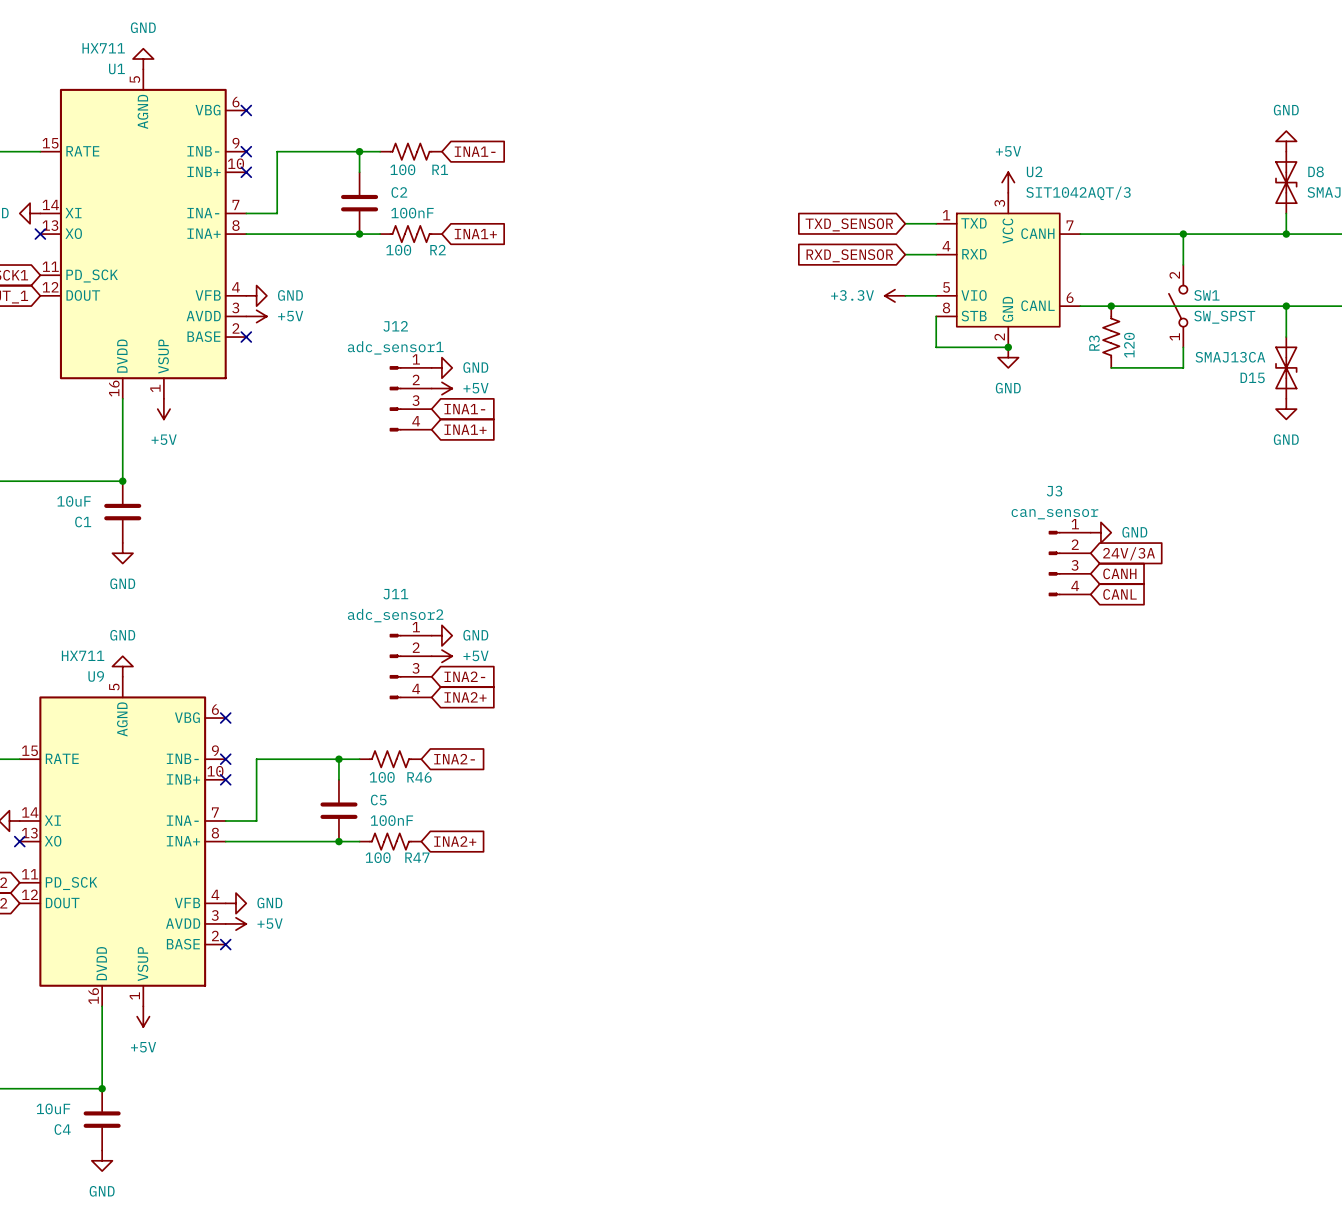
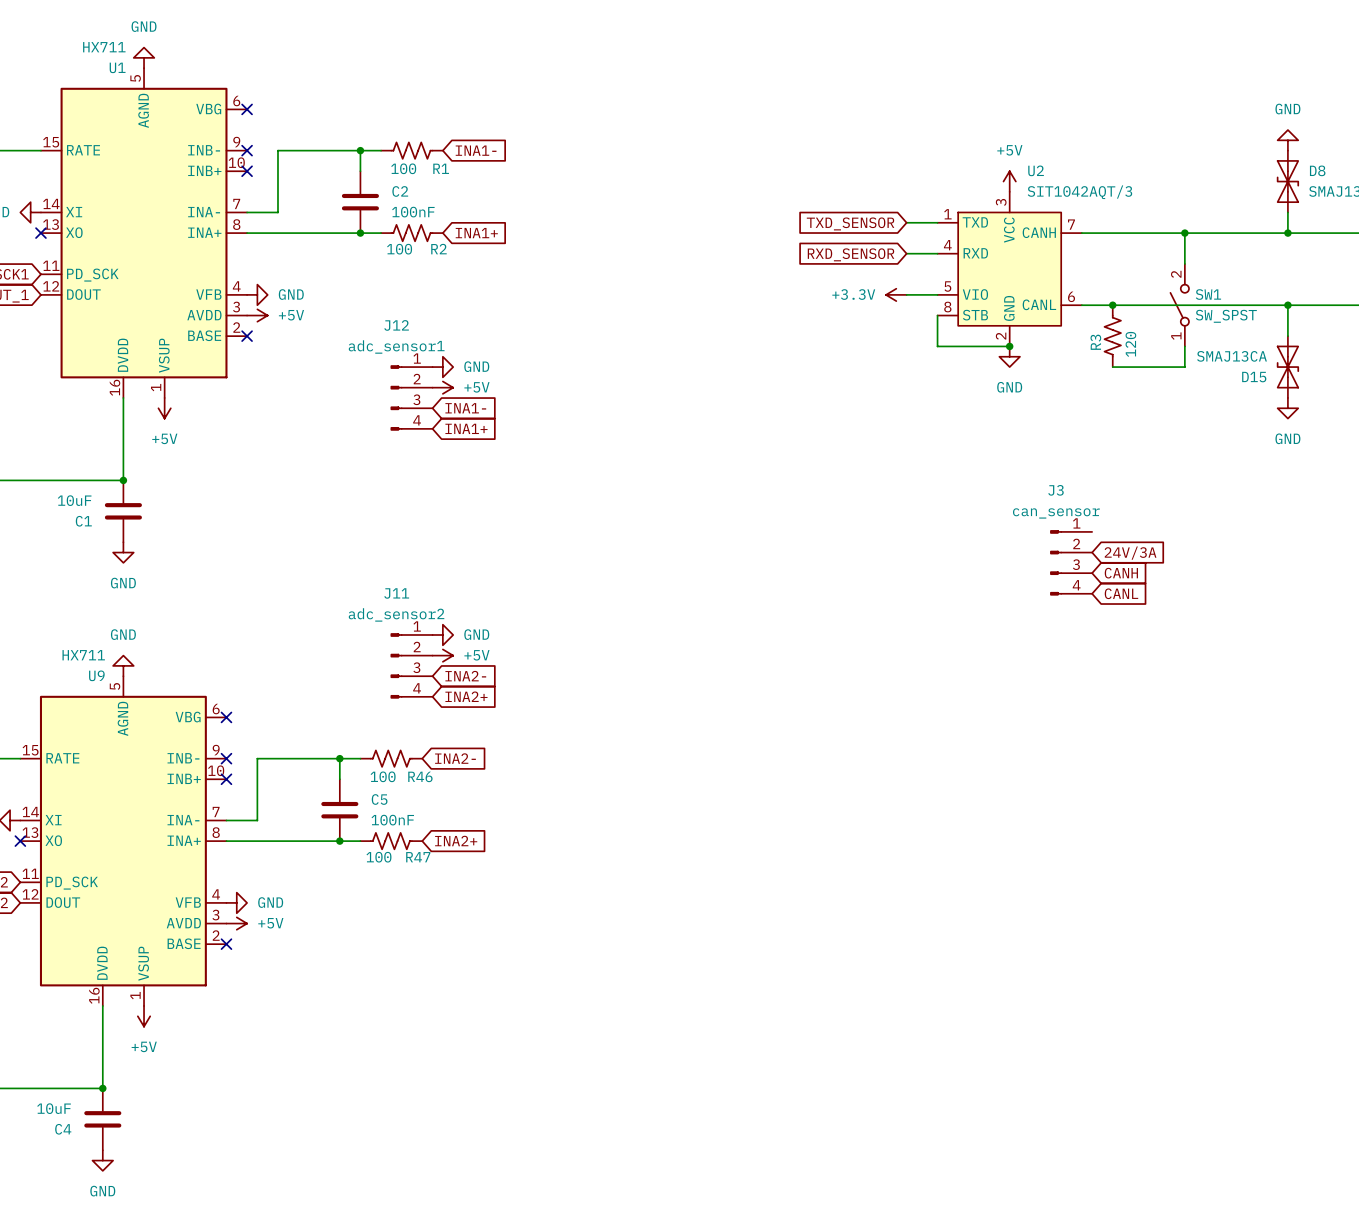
power symbol: GND (1100, 532) -> none

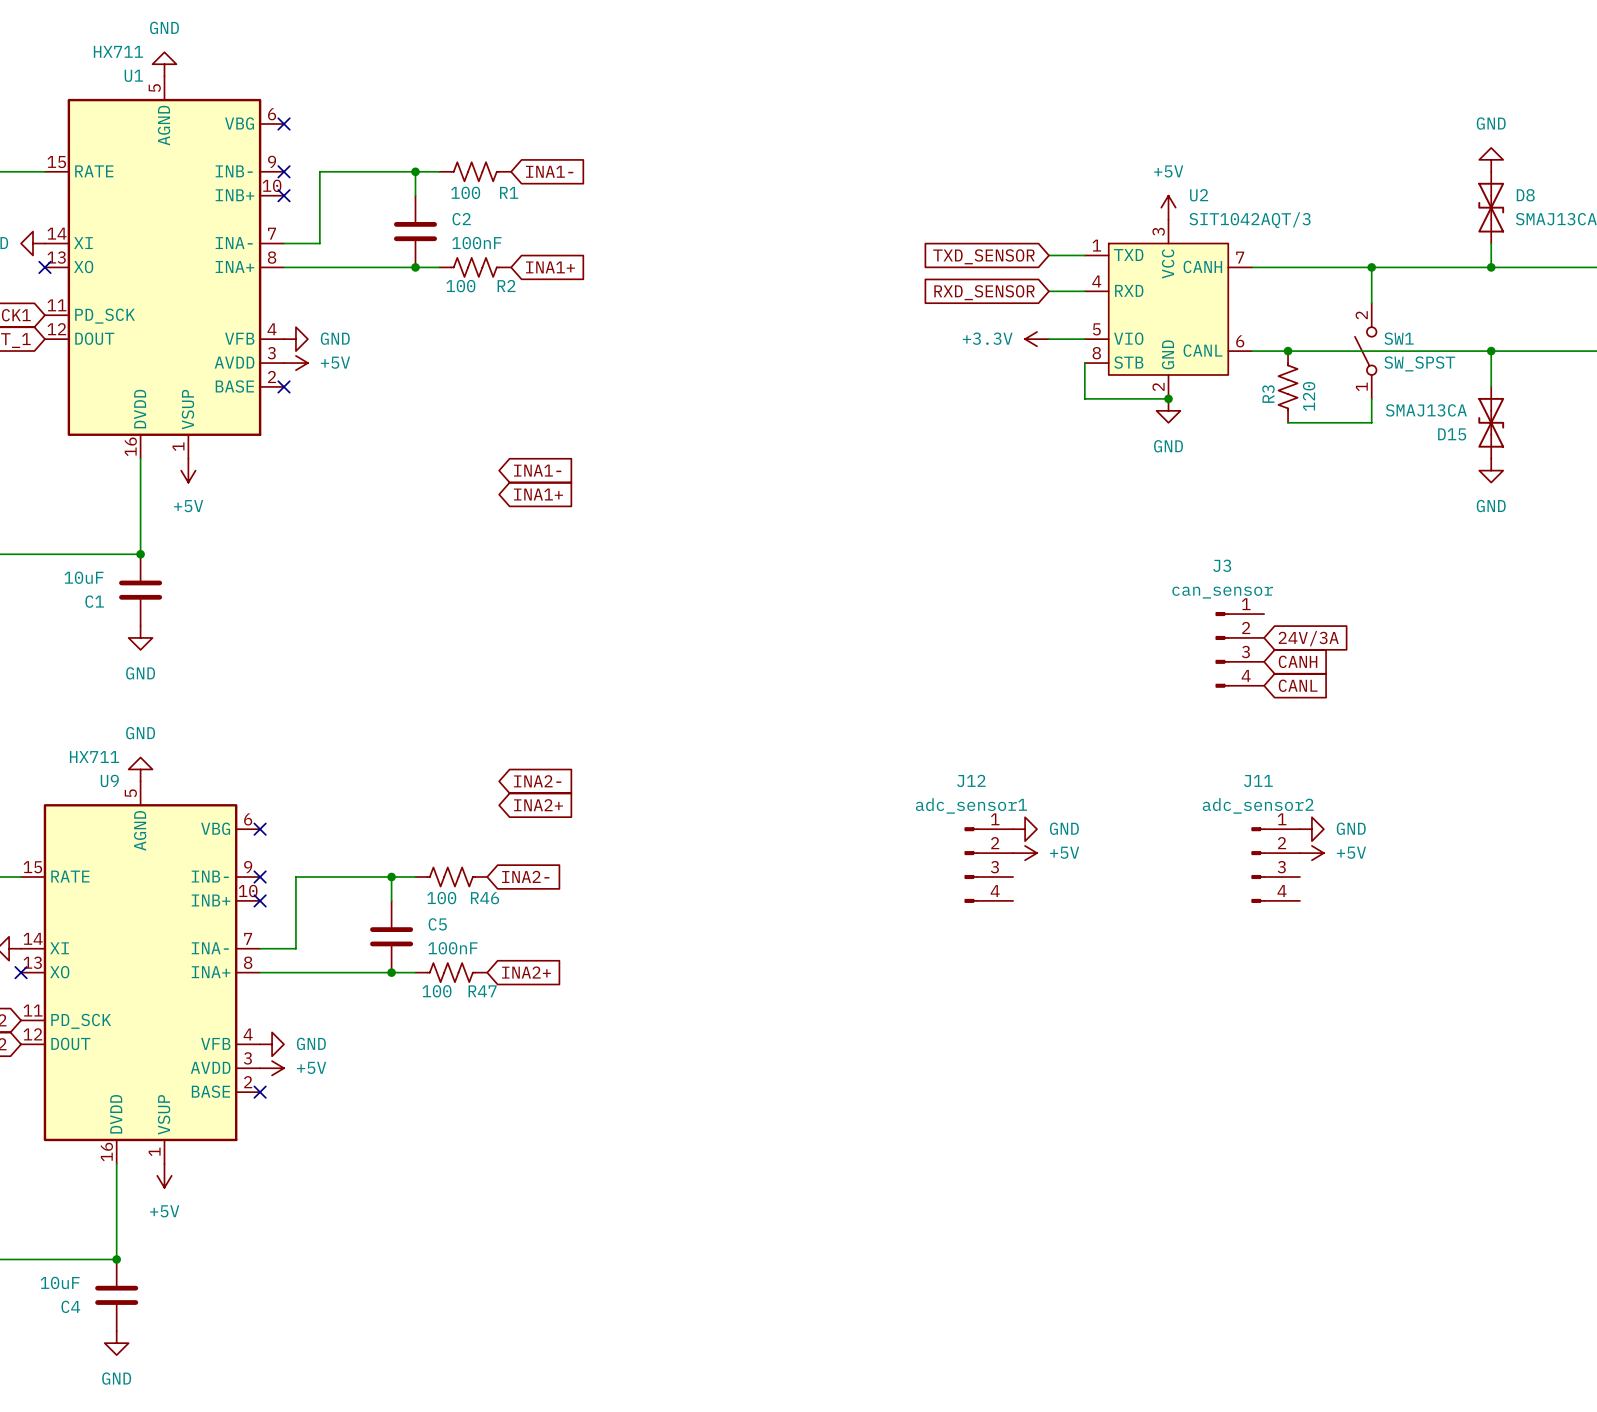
power symbol: GND (442, 367) -> none
power symbol: +5V (442, 387) -> none
J12 position: (411, 397) -> (988, 865)
power symbol: GND (442, 634) -> none
power symbol: +5V (442, 655) -> none
J11 position: (411, 665) -> (1275, 865)
power symbol: none -> GND (1025, 829)
power symbol: none -> GND (1311, 829)
power symbol: none -> +5V (1025, 853)
power symbol: none -> +5V (1311, 853)

